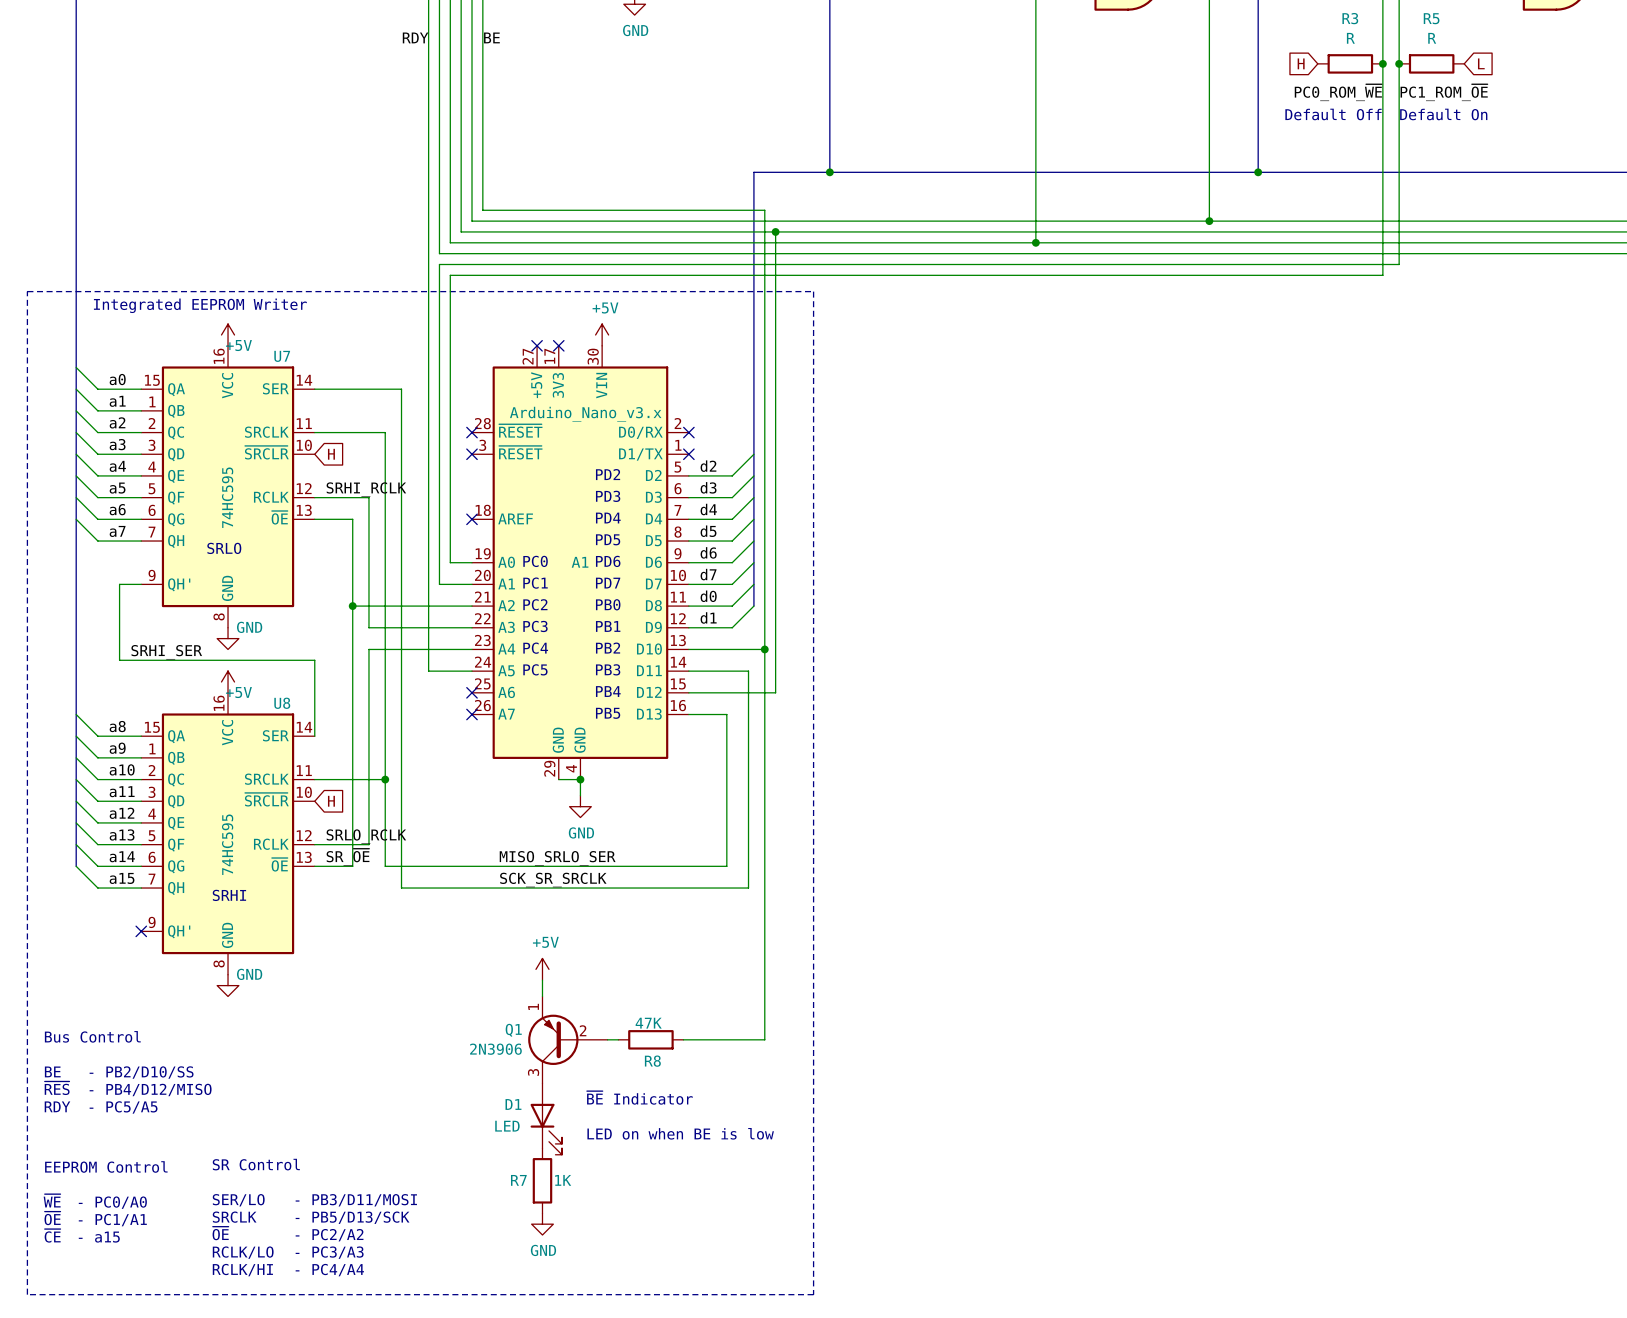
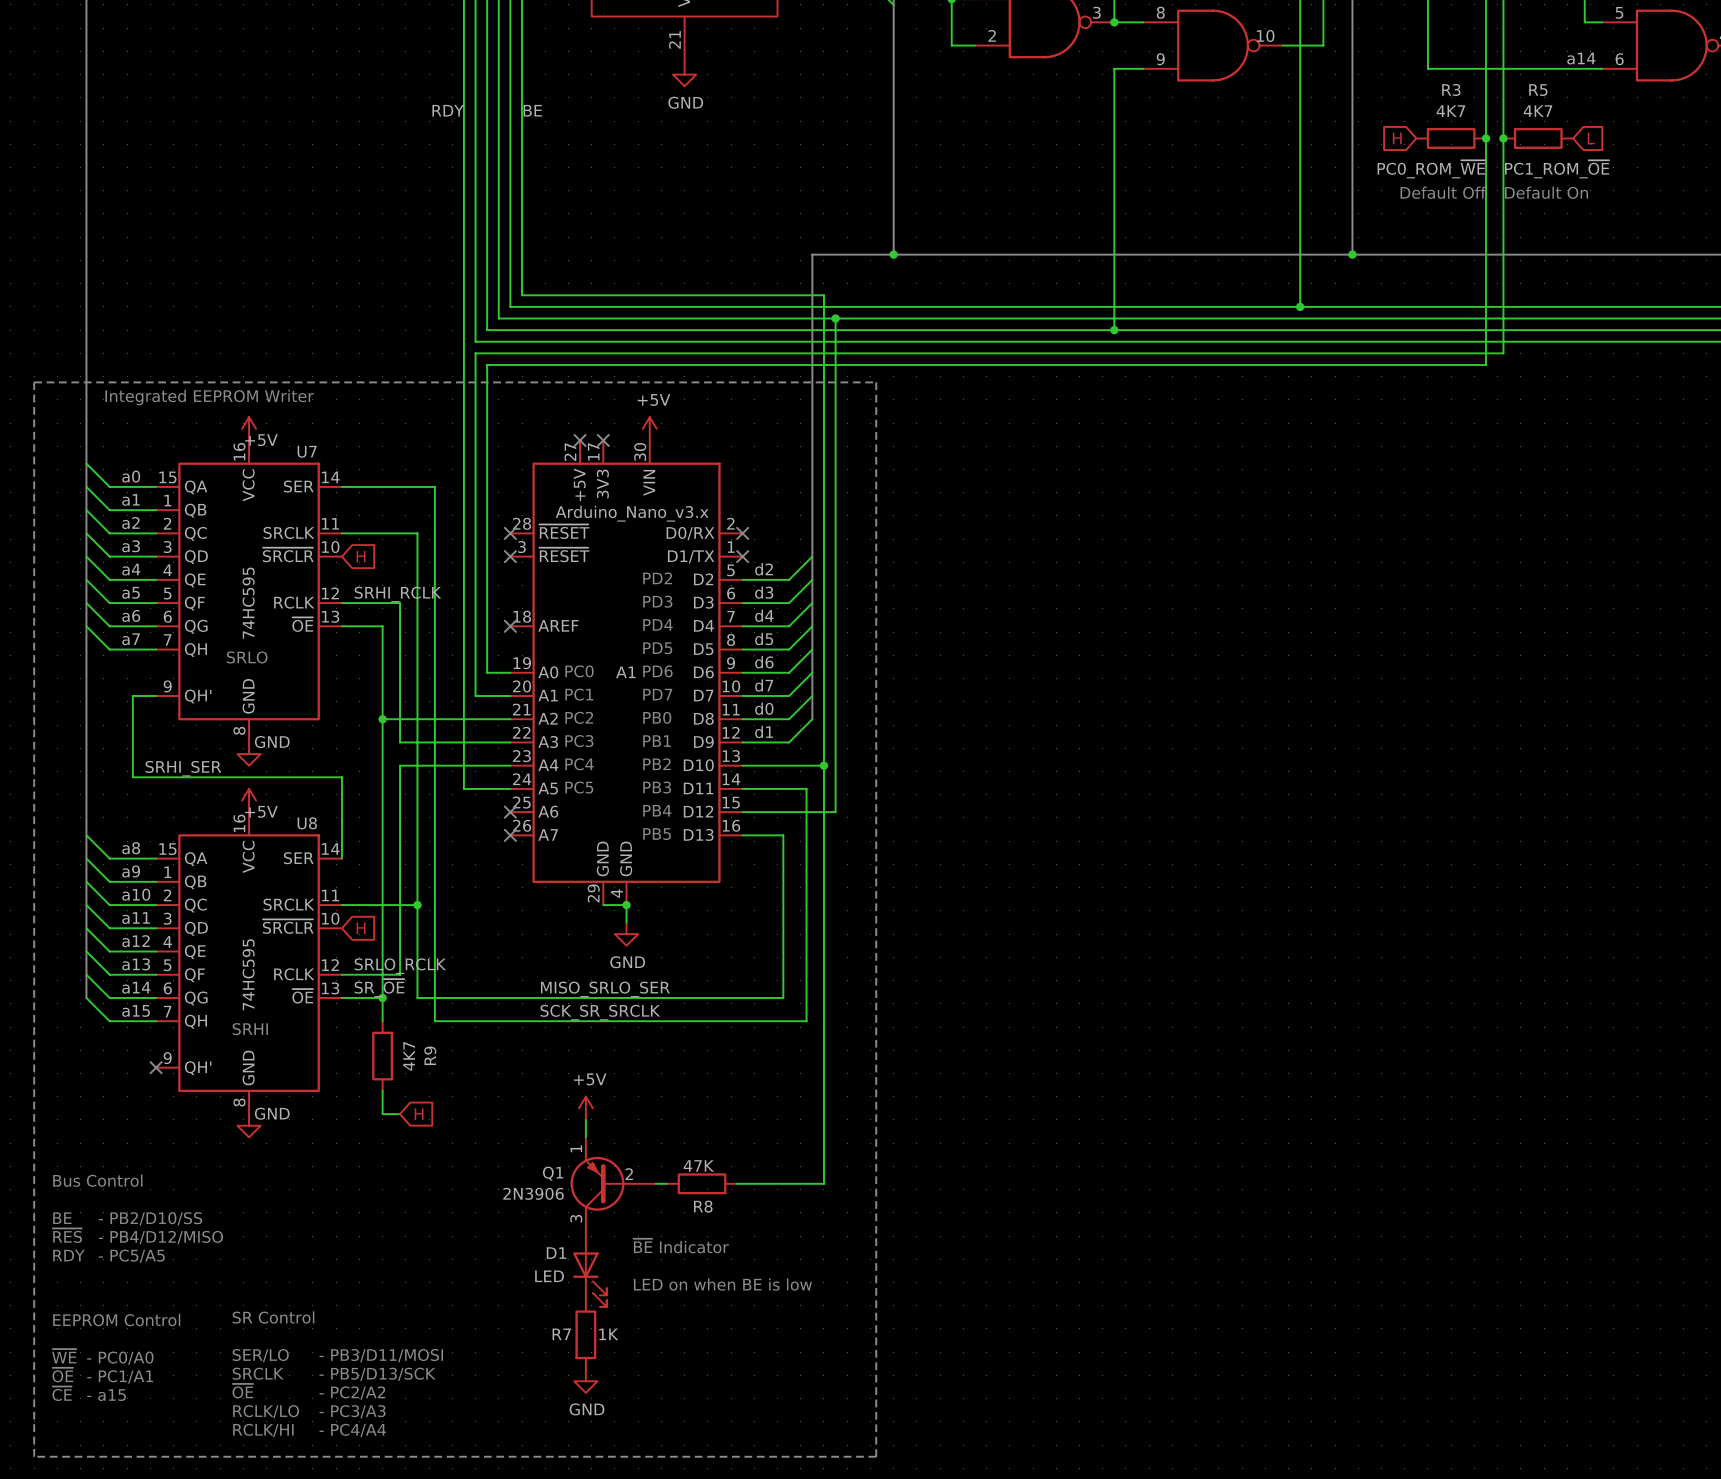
R3 value: R (1350, 38) -> 4K7 (1450, 111)
R5 value: R (1432, 38) -> 4K7 (1537, 111)
wire: none -> (382, 997) (382, 1021)
junction: none -> (382, 997)
R9: none -> 4K7 (382, 1056)
wire: none -> (382, 1090) (382, 1114) (400, 1114)
global label: none -> H (419, 1114)

